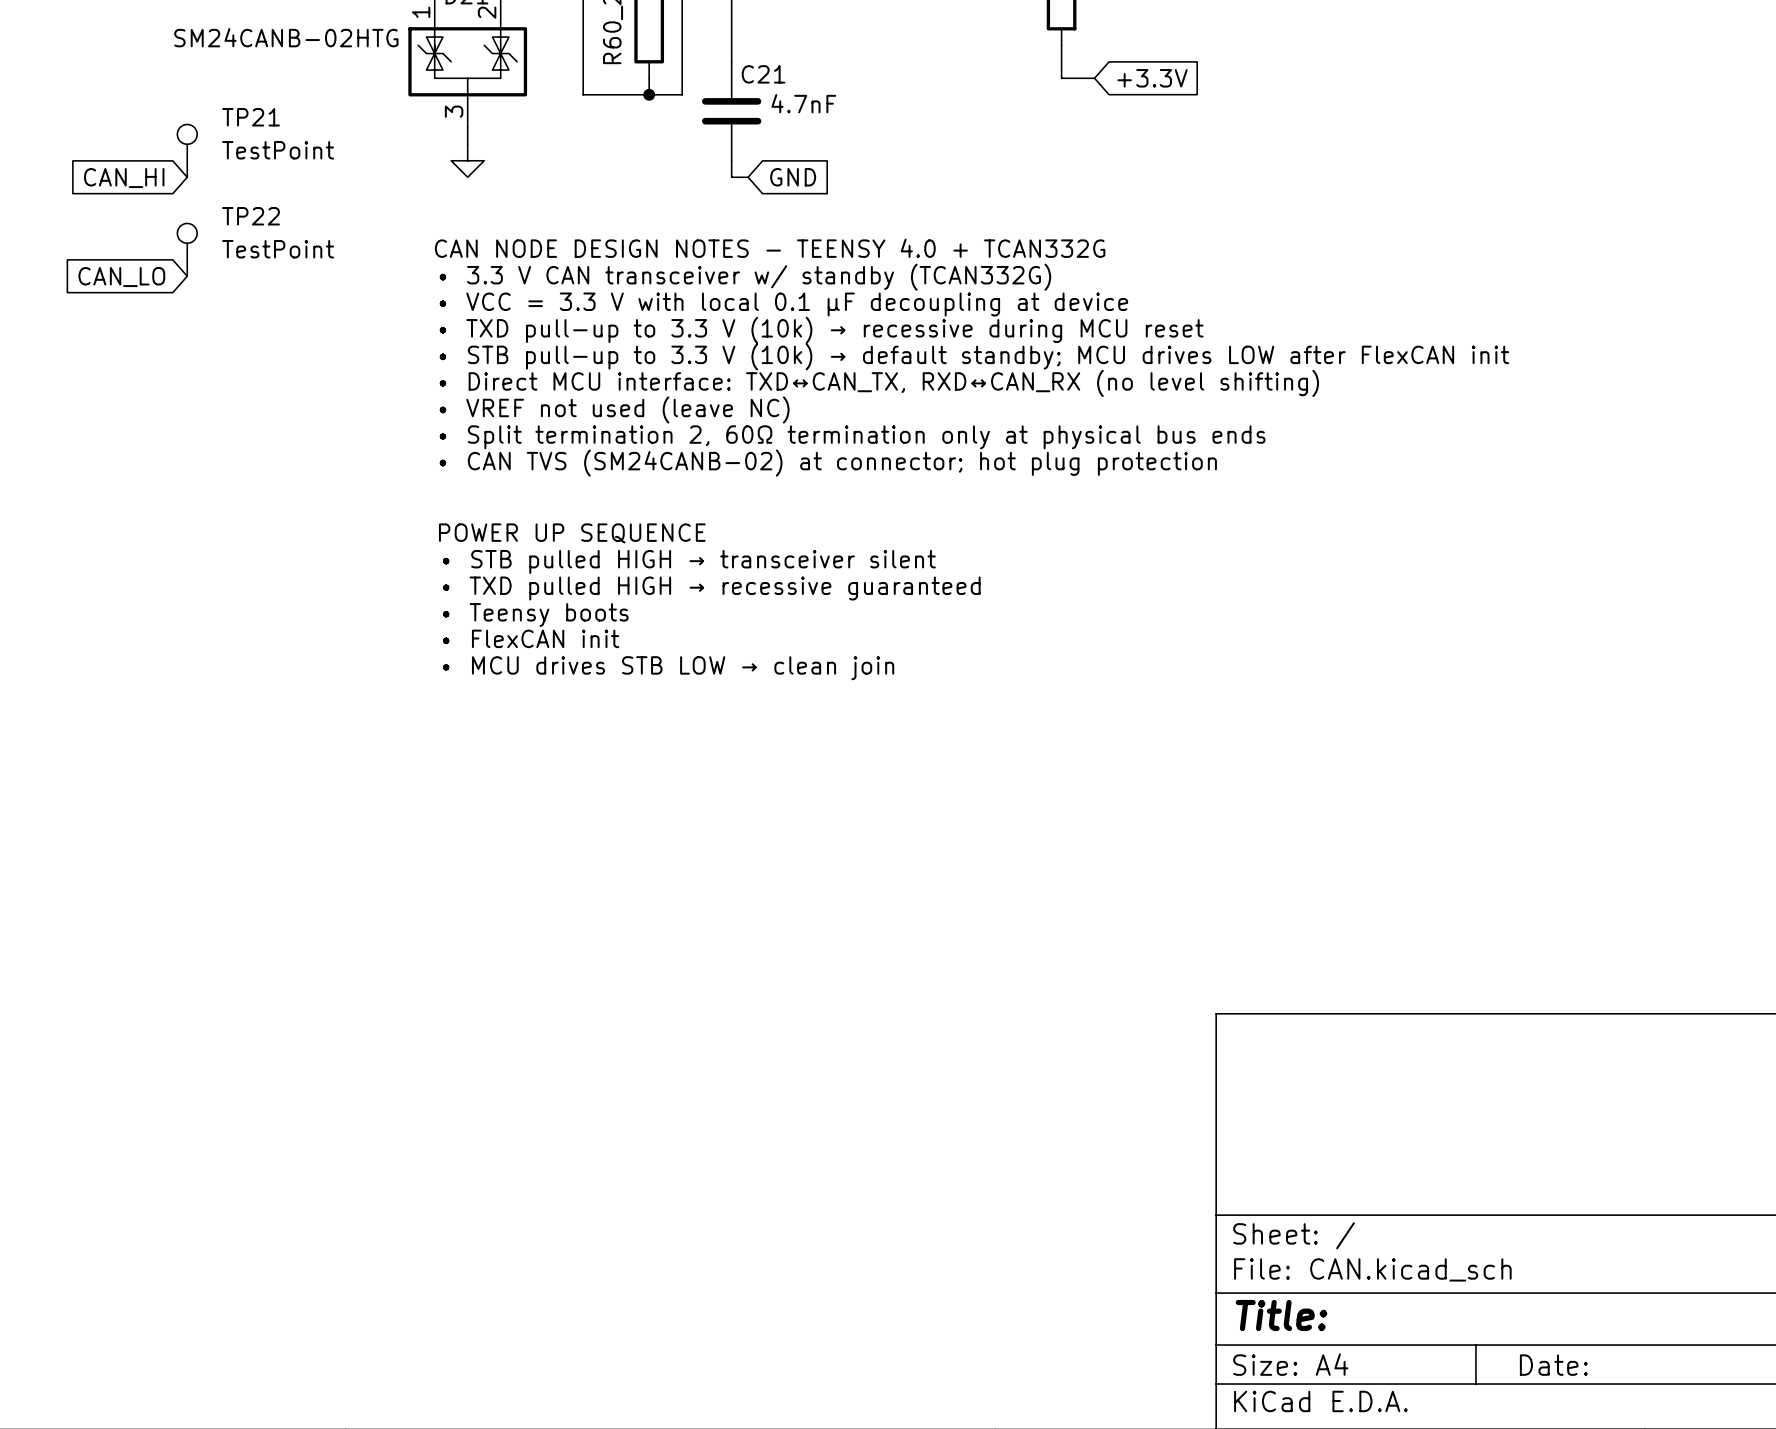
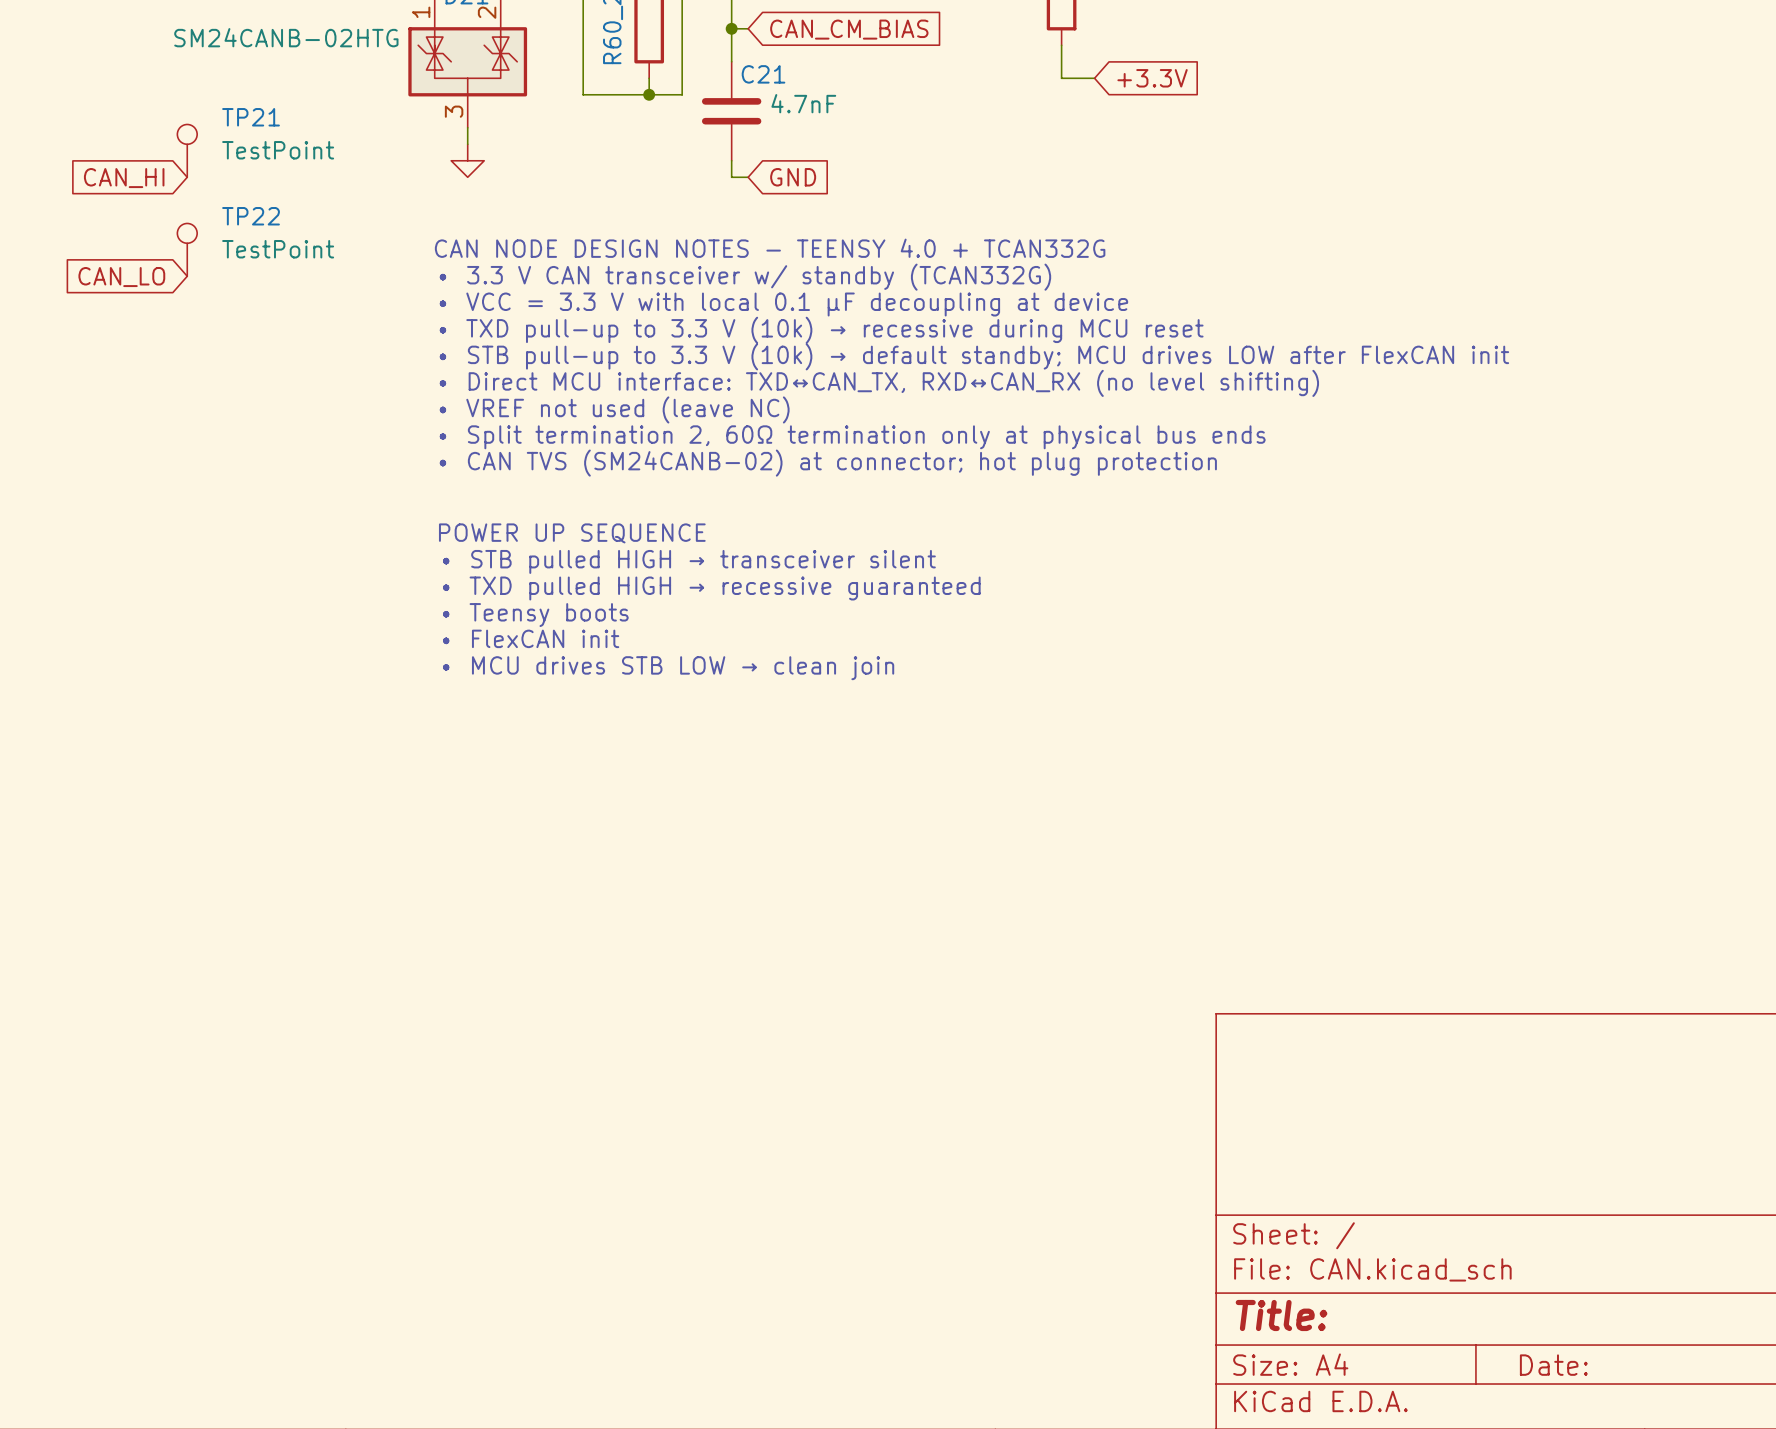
wire: none -> (731, 28) (748, 28)
junction: none -> (731, 28)
global label: none -> CAN_CM_BIAS (849, 29)

